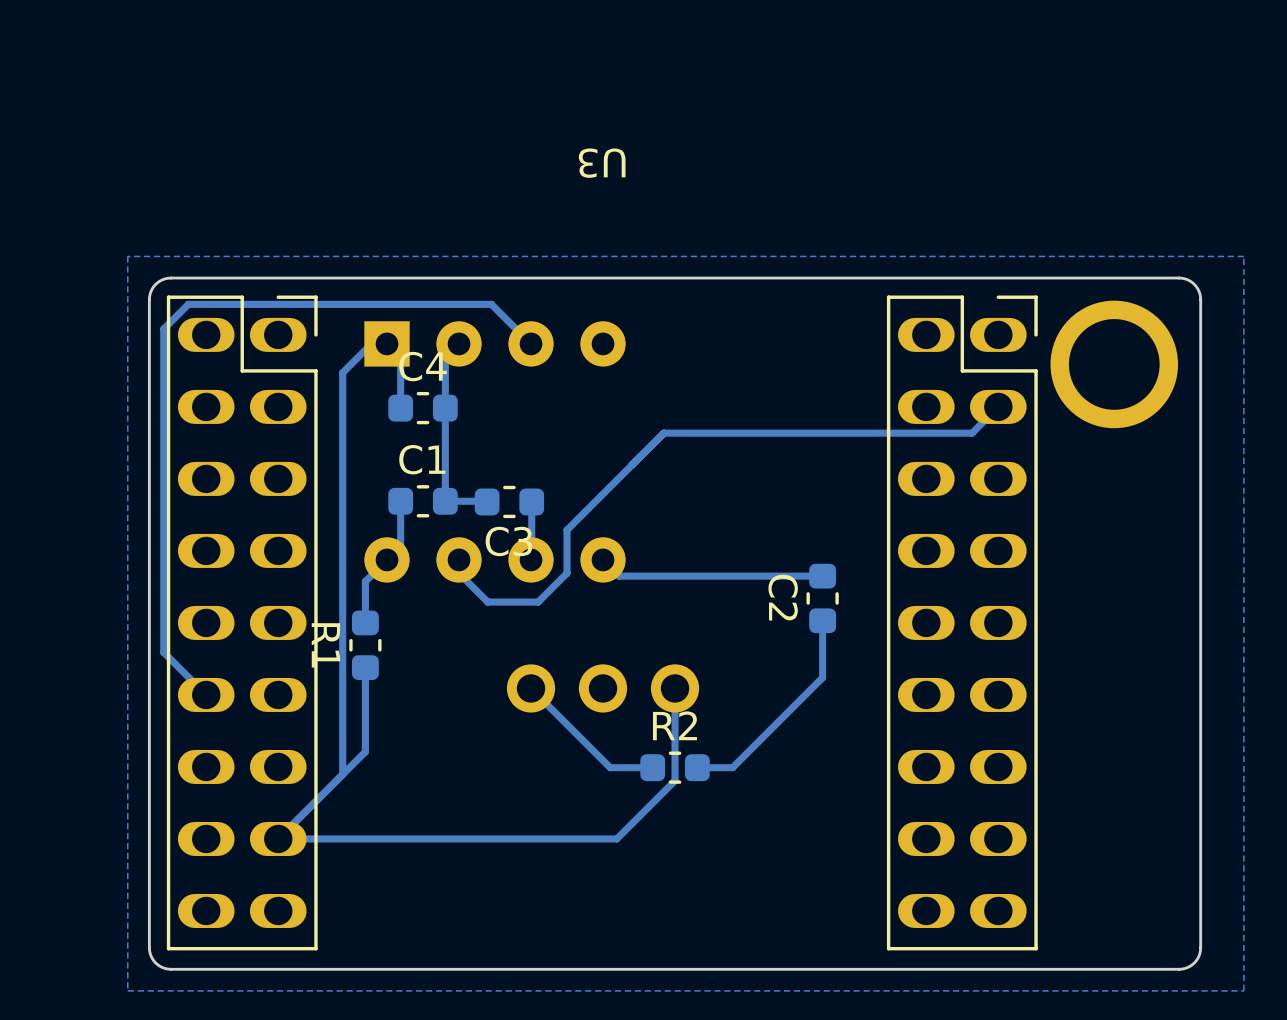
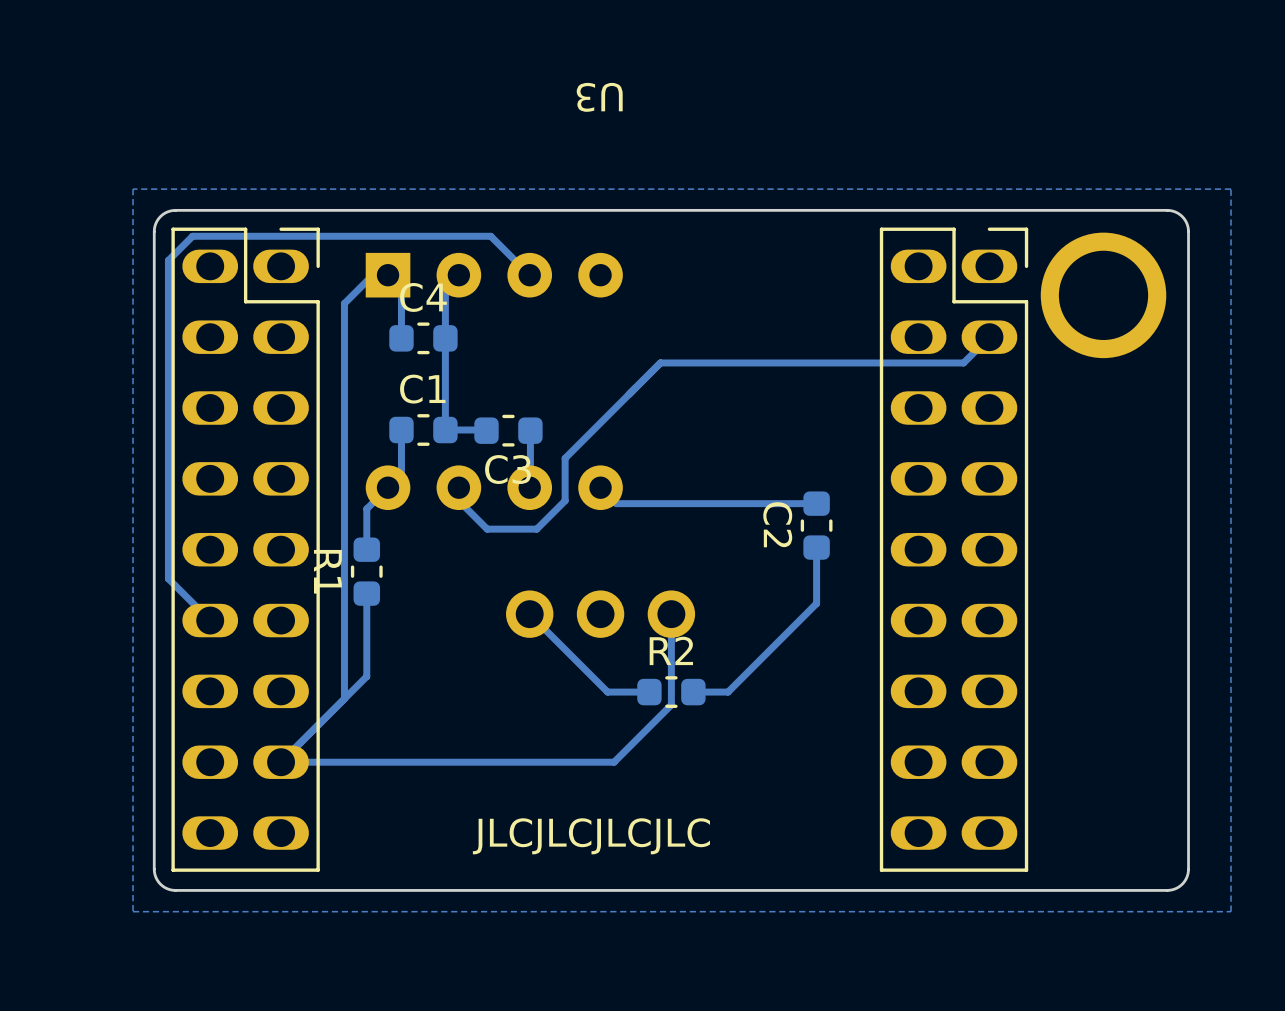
text: none -> JLCJLCJLCJLC (591, 836)

